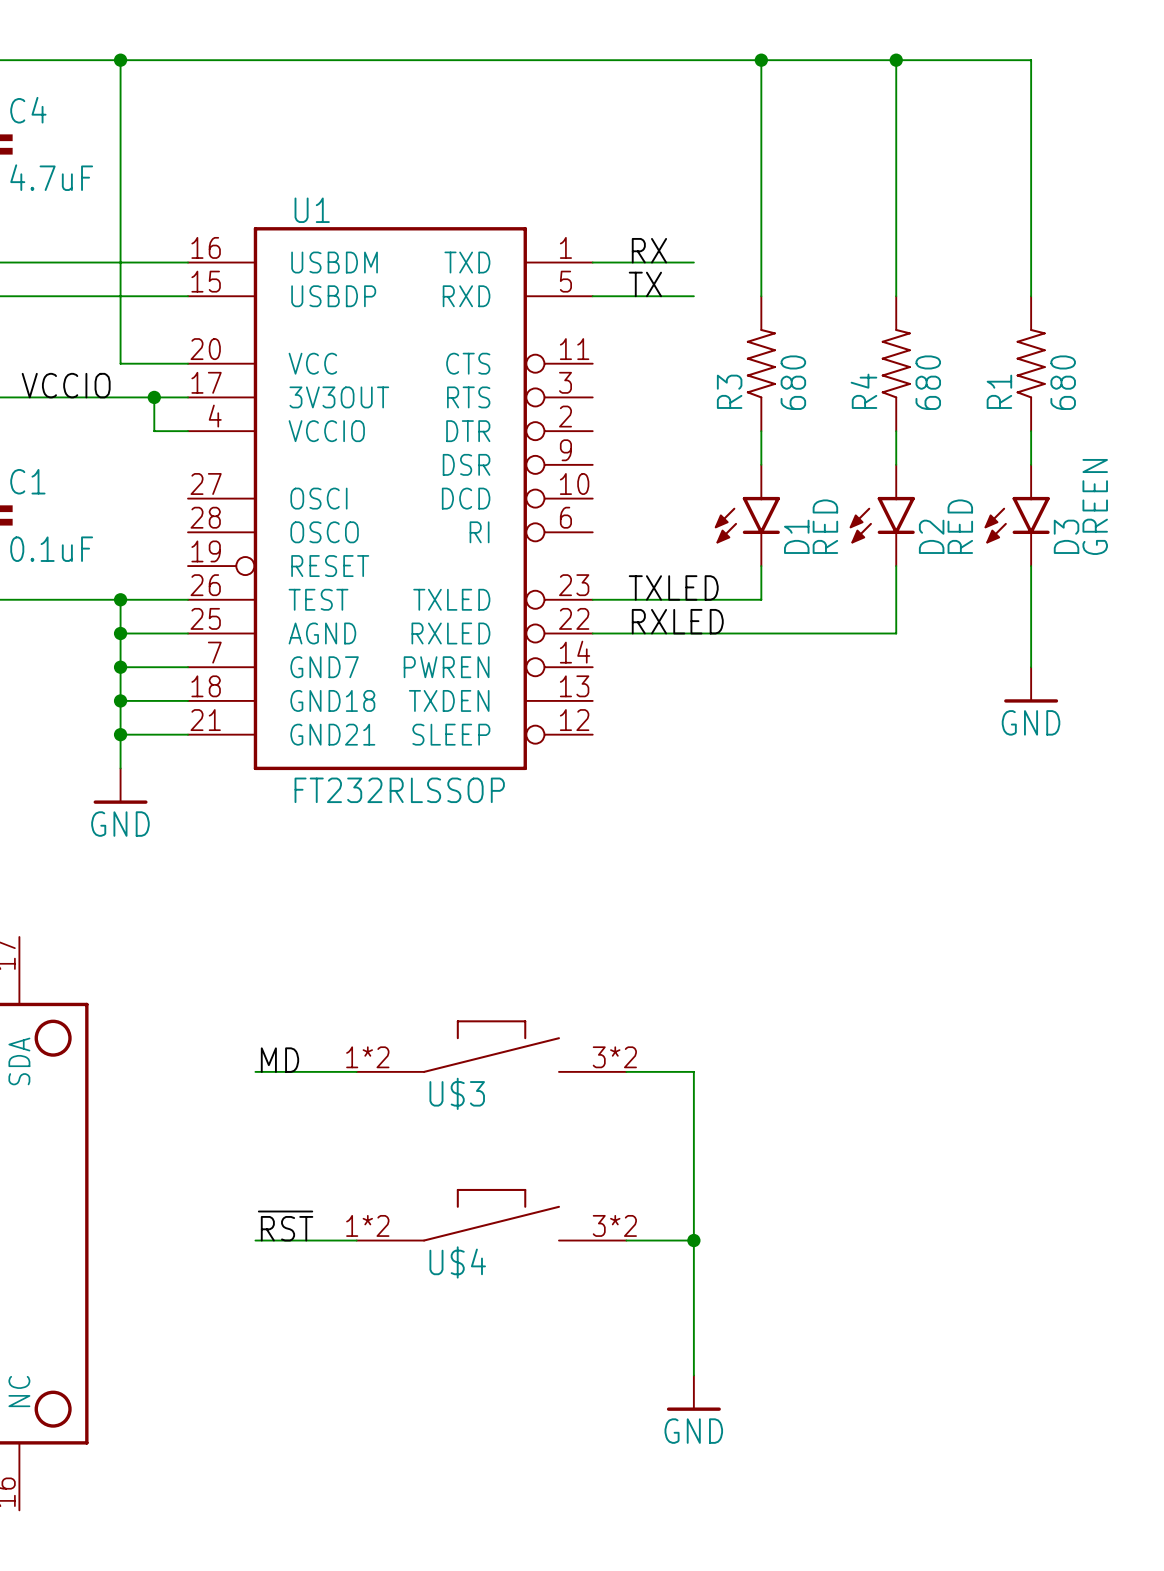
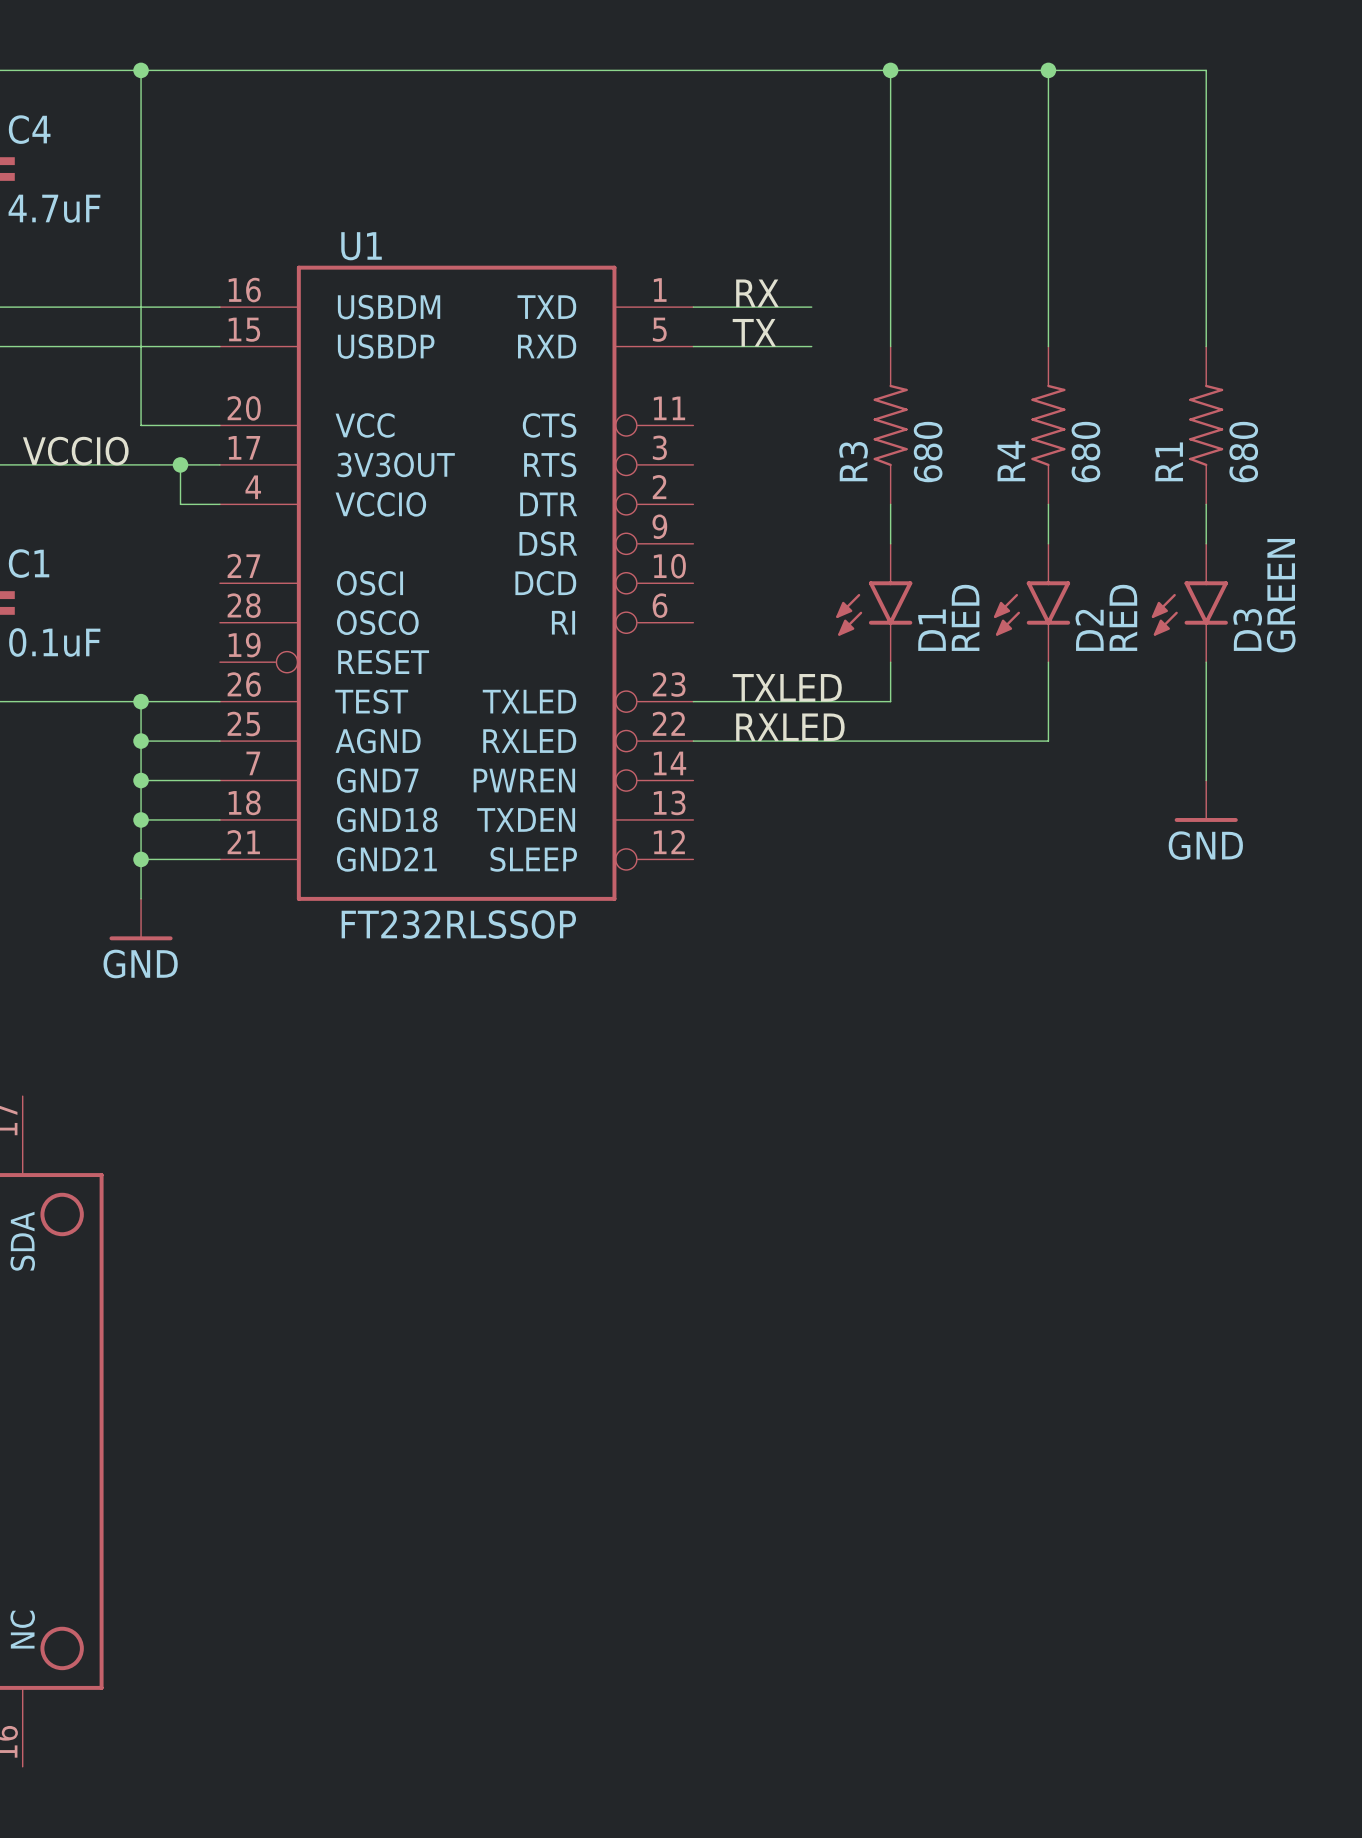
U$3: (491, 1046) -> none
label: MD (279, 1060) -> none
wire: (255, 1071) (356, 1071) -> none
wire: (626, 1071) (693, 1071) (693, 1375) -> none
U$4: (491, 1215) -> none
label: ~{RST} (285, 1226) -> none
wire: (255, 1240) (356, 1240) -> none
wire: (626, 1240) (693, 1240) -> none
junction: (693, 1240) -> none
power symbol: GND (693, 1393) -> none

